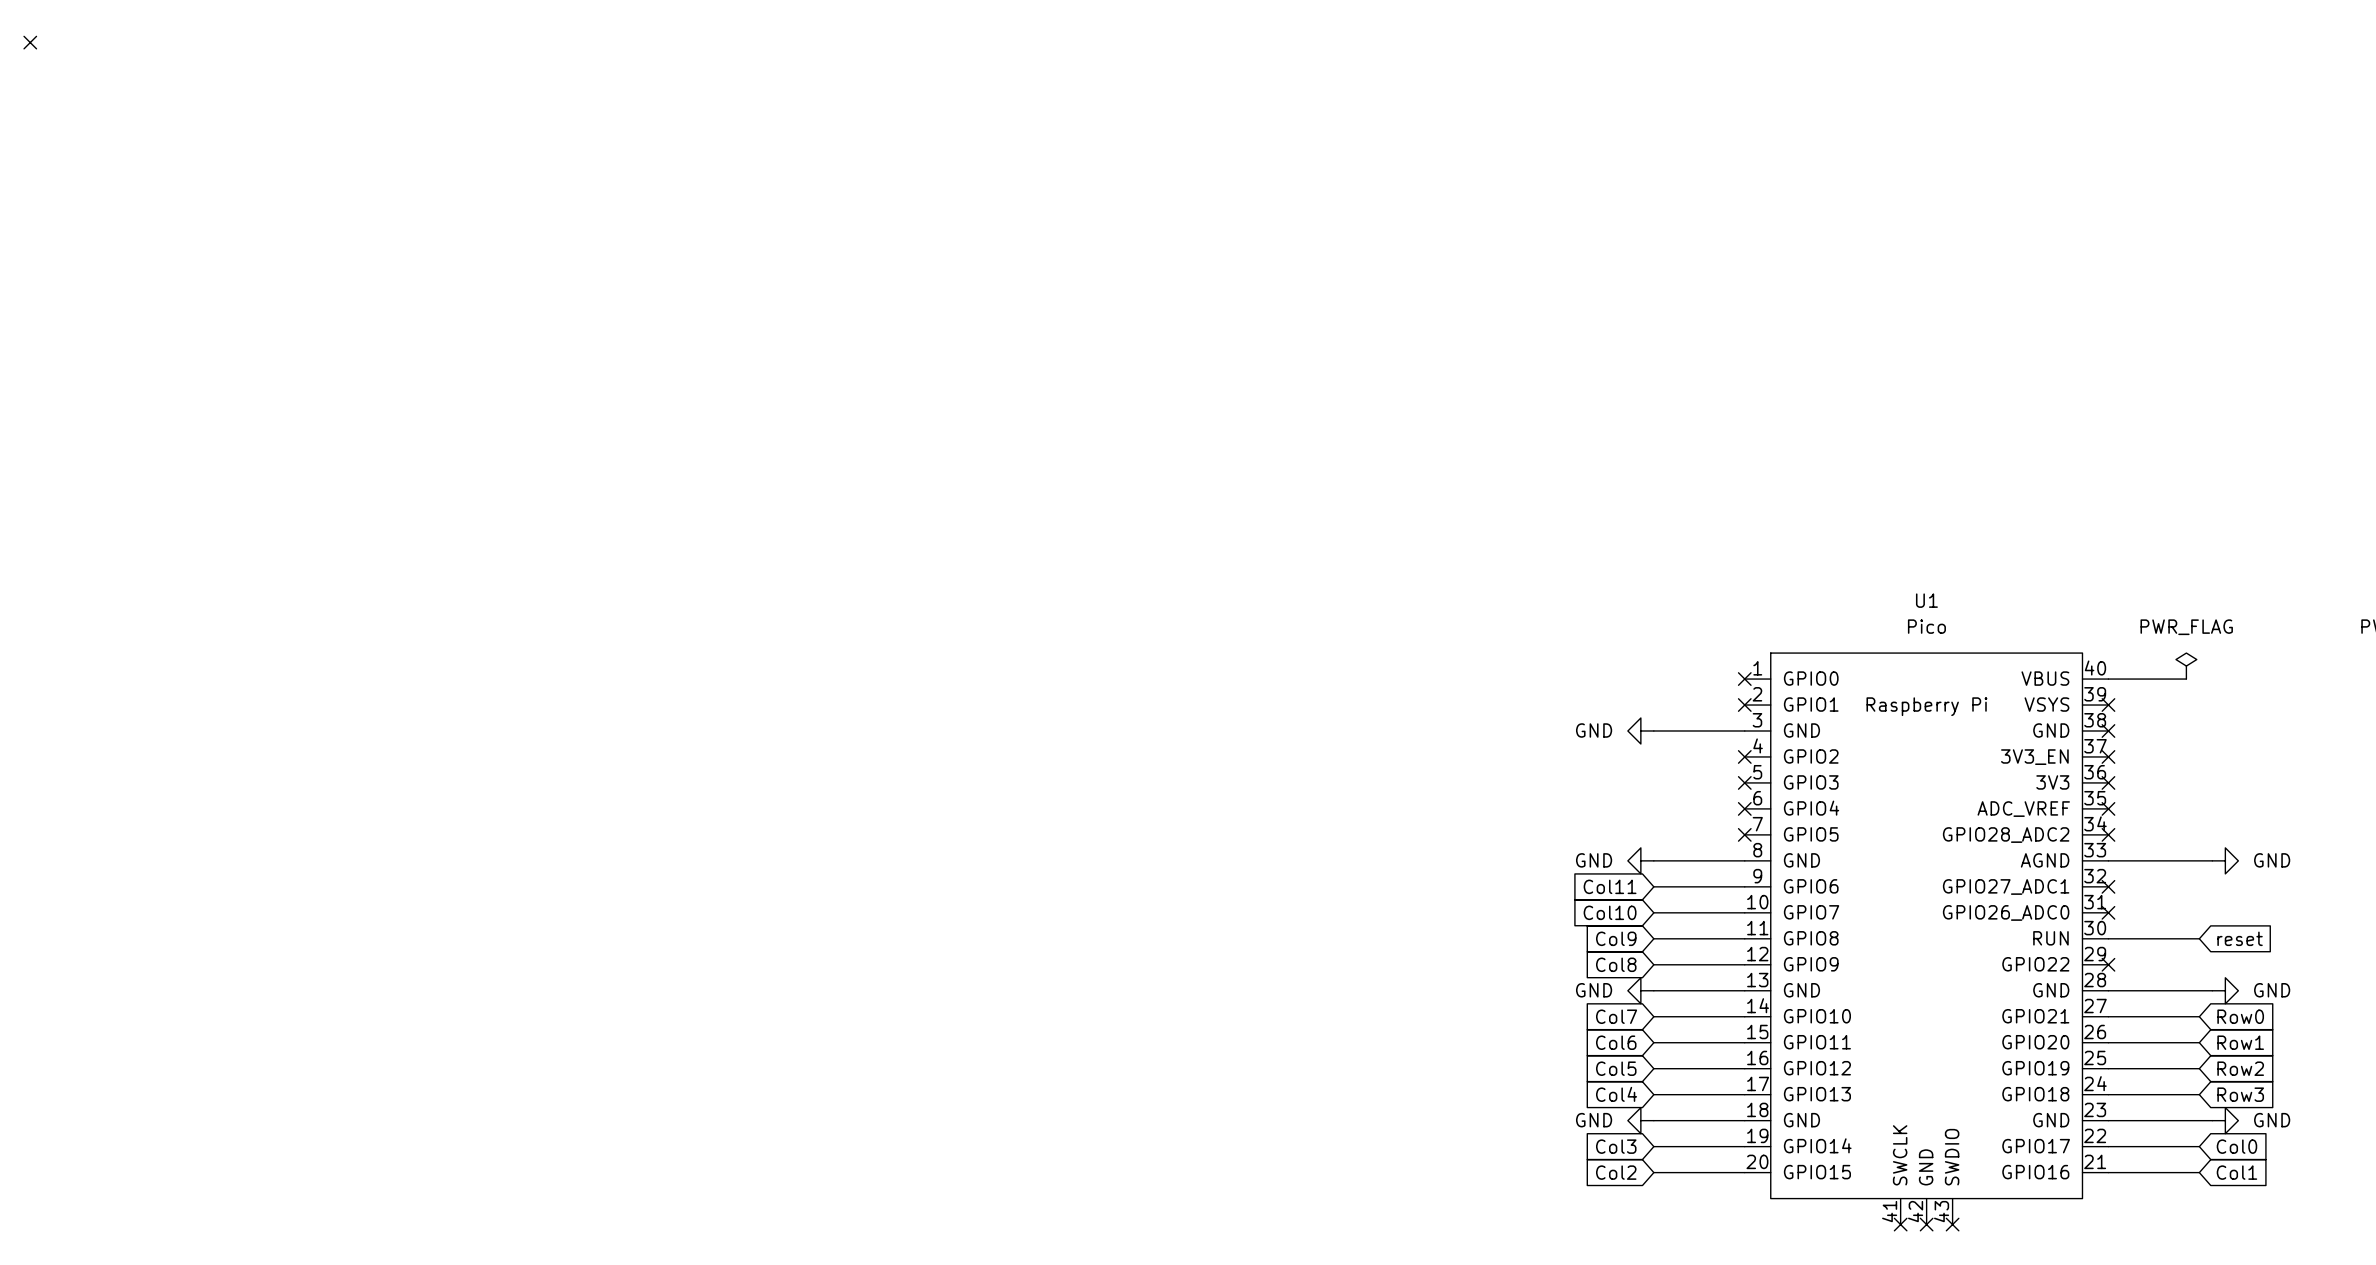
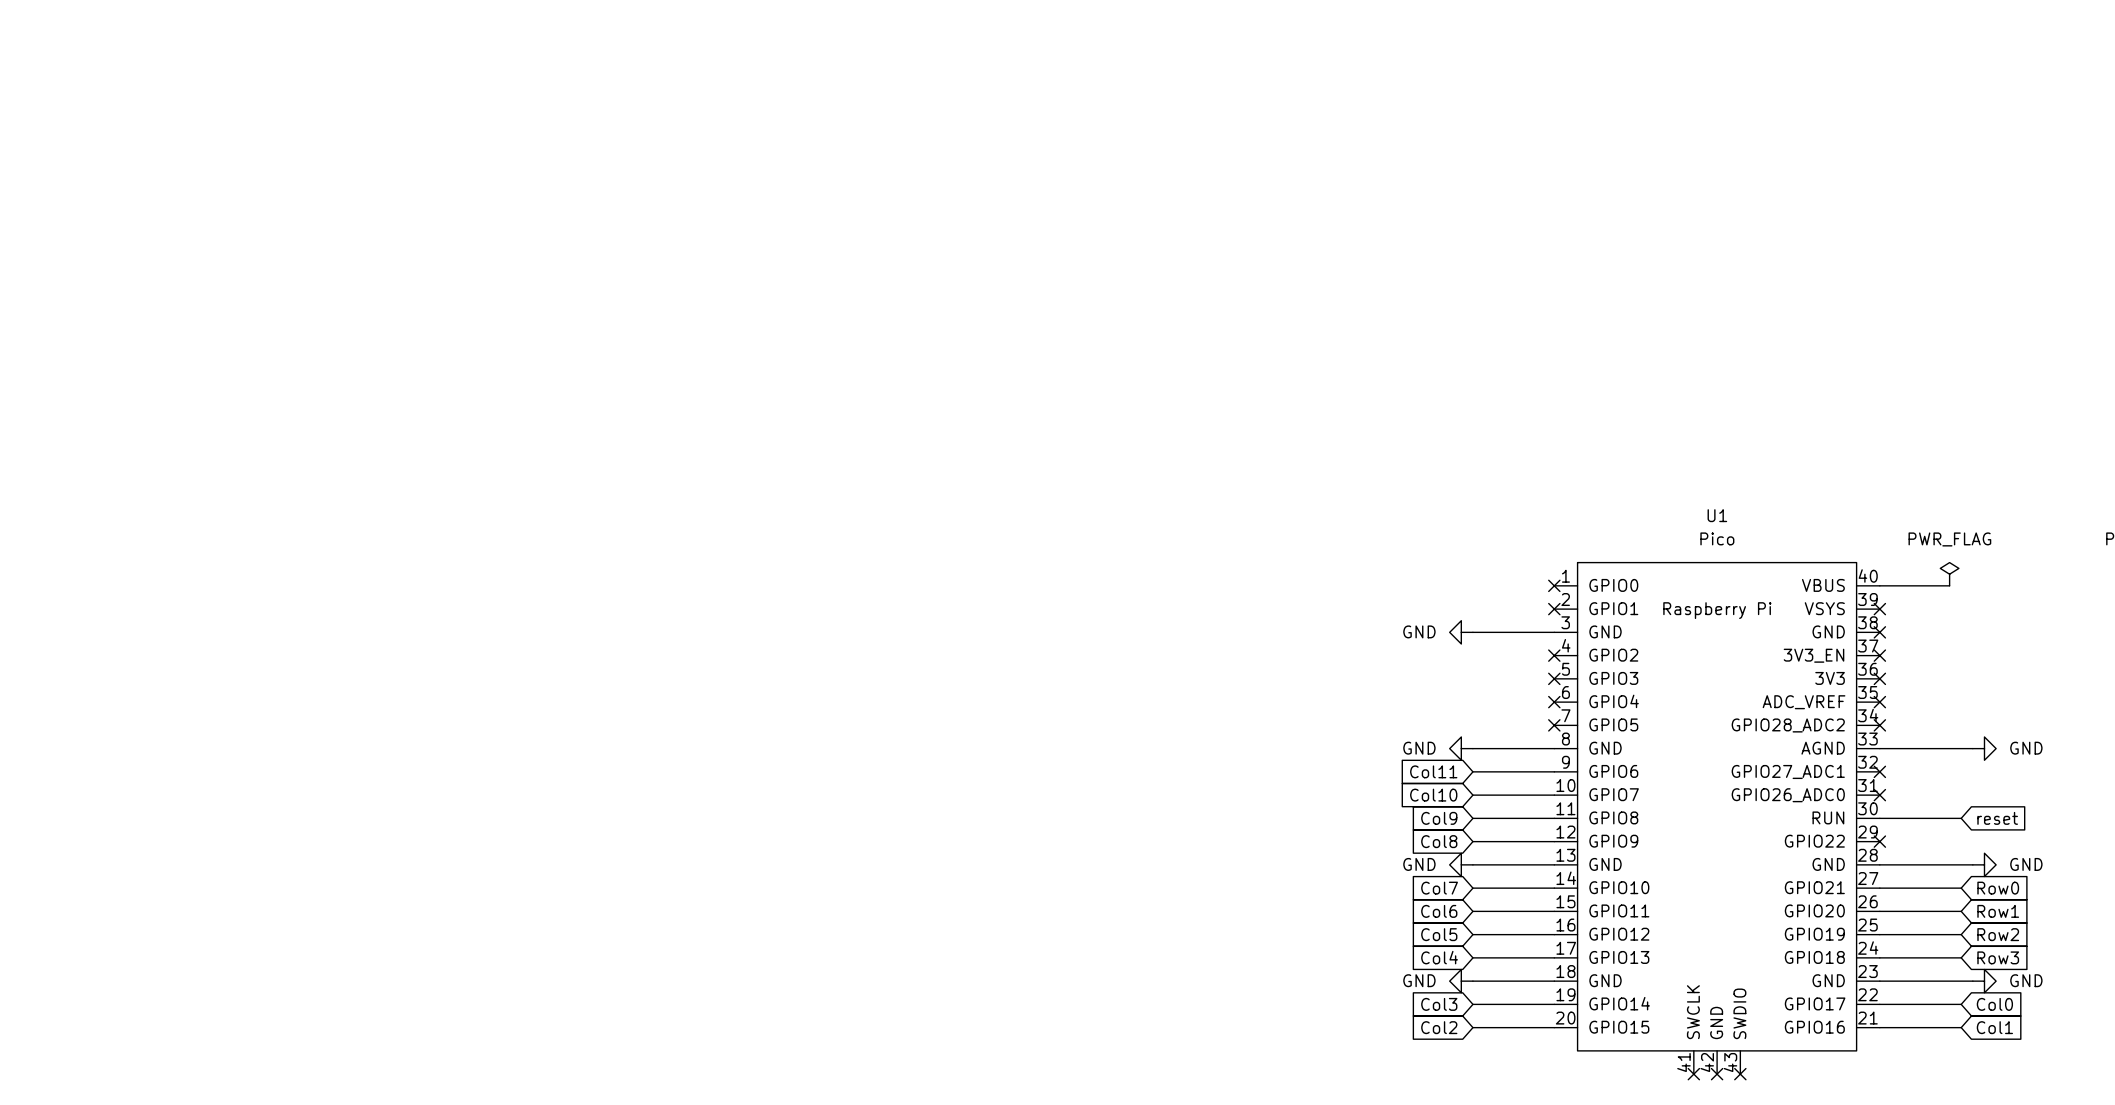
no-connect mark: (30, 42) -> none

